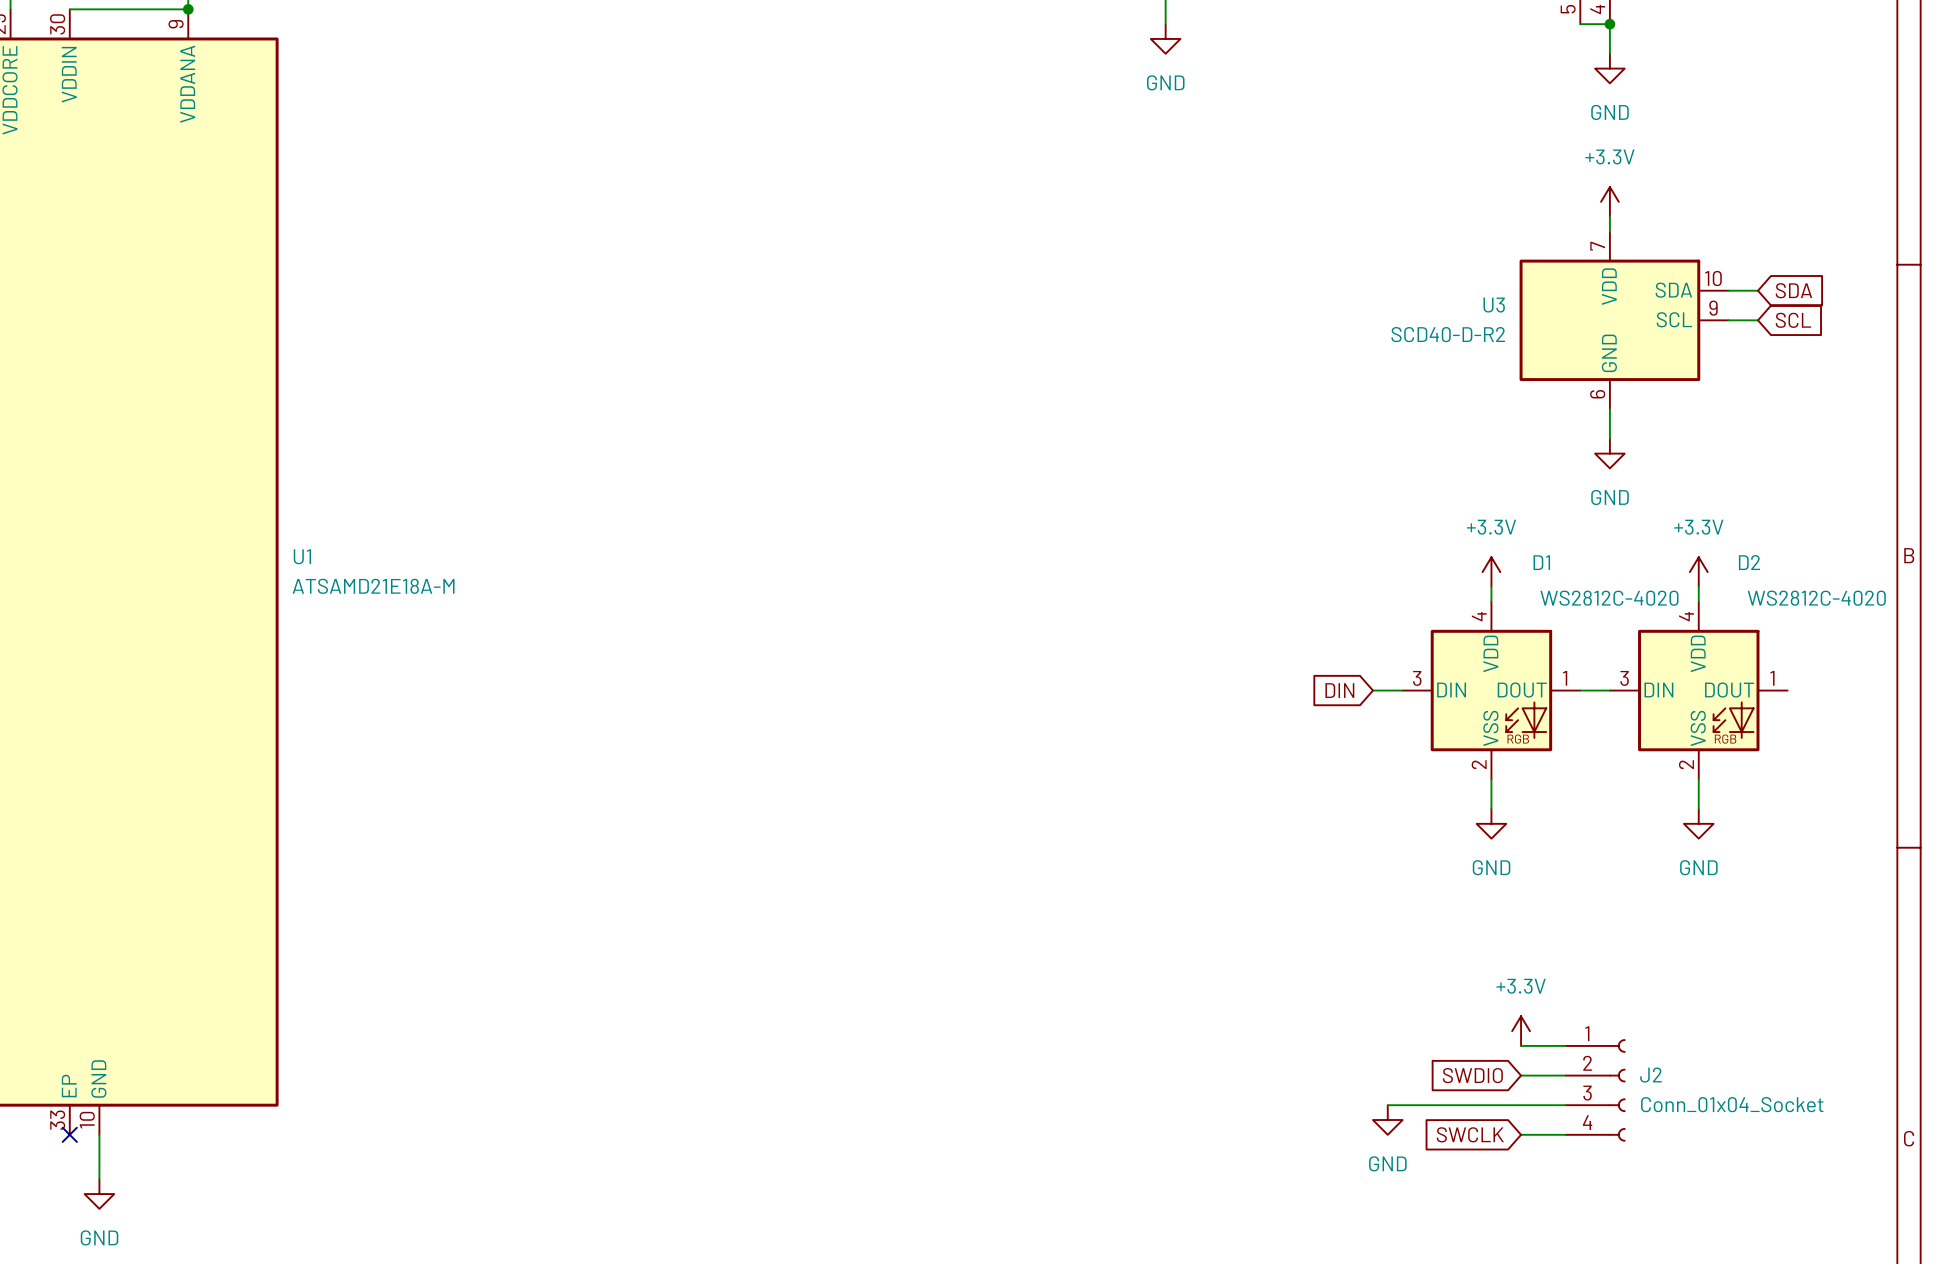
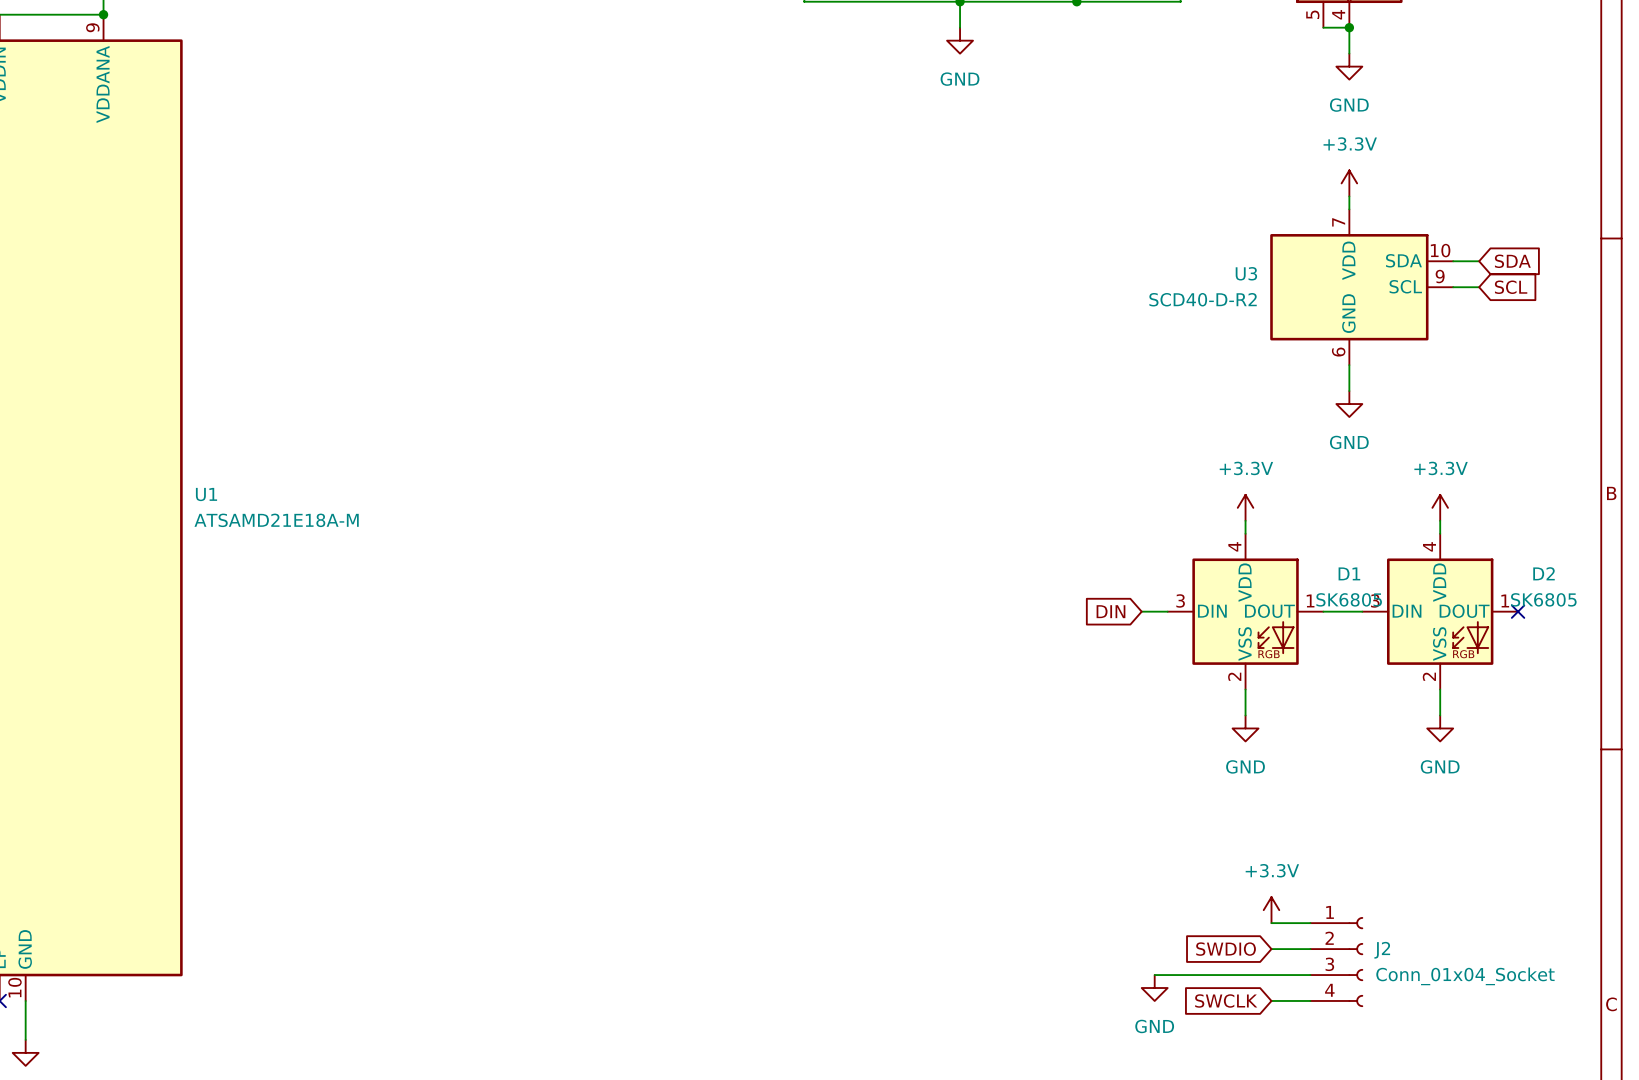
D1 name position: D1 (1541, 562) -> D1 (1349, 573)
D2 name position: D2 (1749, 562) -> D2 (1544, 573)
power symbol position: +3.3V (1698, 572) -> +3.3V (1440, 507)
wire: (1698, 586) (1698, 601) -> (1440, 520) (1440, 533)
D1 value: WS2812C-4020 (1609, 598) -> SK6805 (1349, 599)
D2 value: WS2812C-4020 (1816, 598) -> SK6805 (1543, 599)
D2 position: (1698, 690) -> (1440, 611)
no-connect mark: none -> (1518, 611)
wire: (1698, 779) (1698, 809) -> (1440, 689) (1440, 715)
power symbol position: GND (1698, 823) -> GND (1440, 728)

